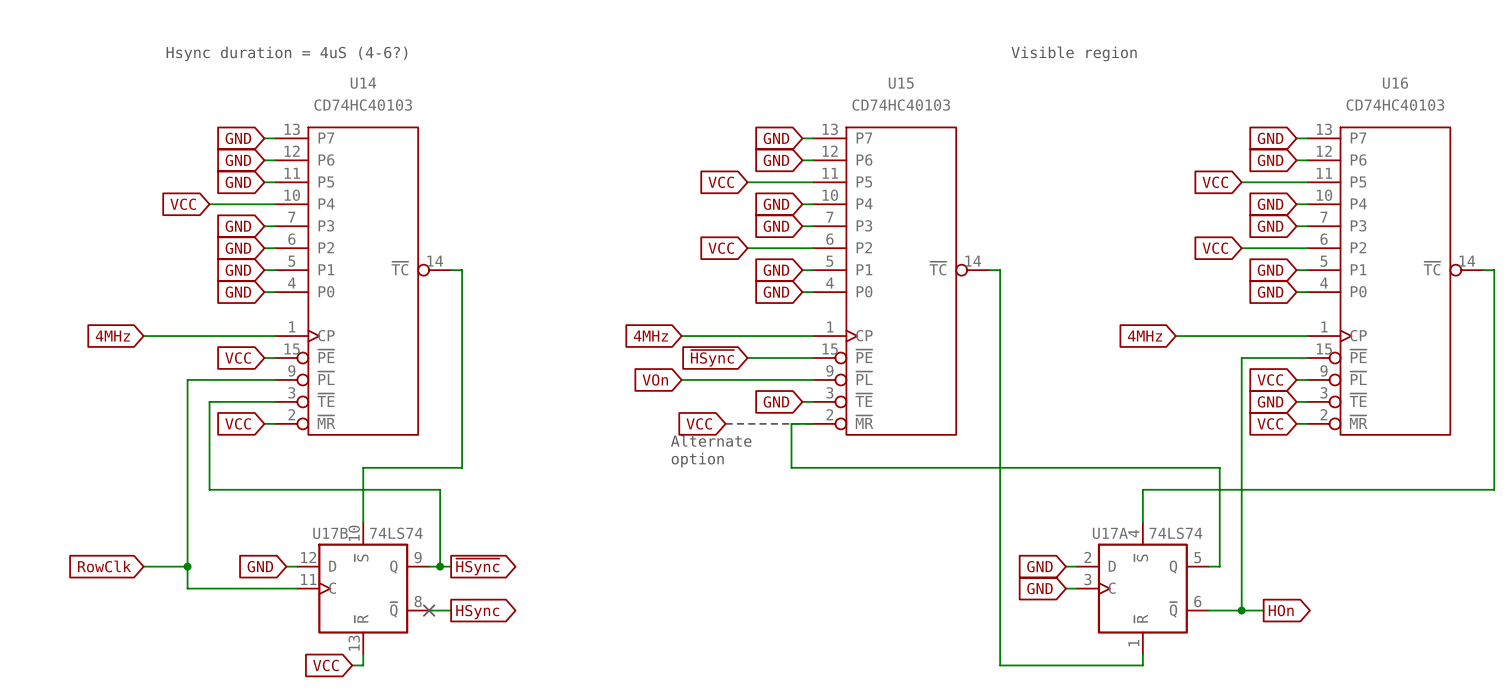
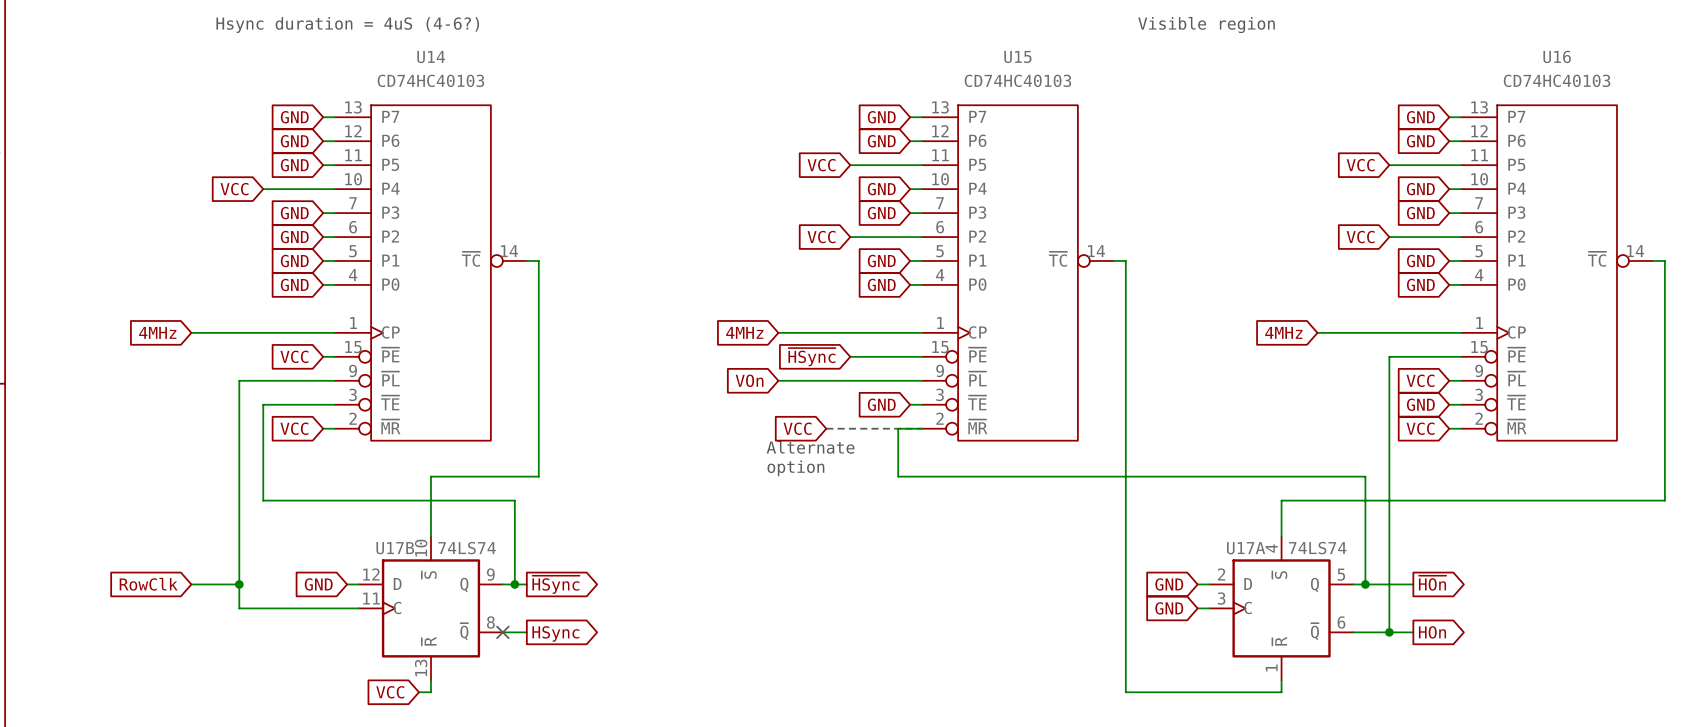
global label: none -> ~{HOn} (1432, 583)
wire: none -> (1365, 584) (1413, 584)
junction: none -> (1365, 584)

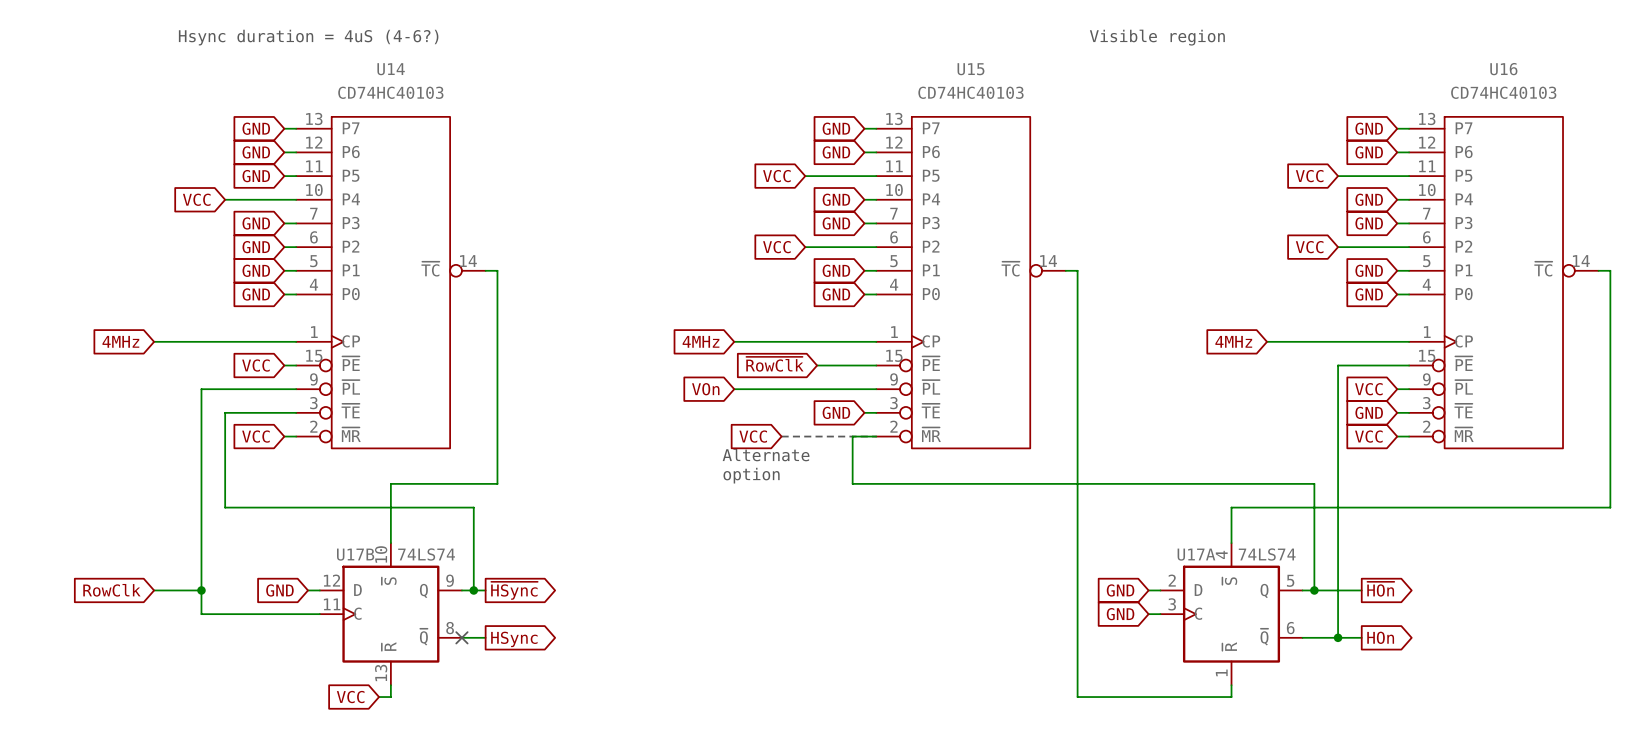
global label: none -> ~{RowClk} (774, 364)
wire: (850, 356) (862, 356) -> none
global label: ~{HSync} (812, 357) -> none

